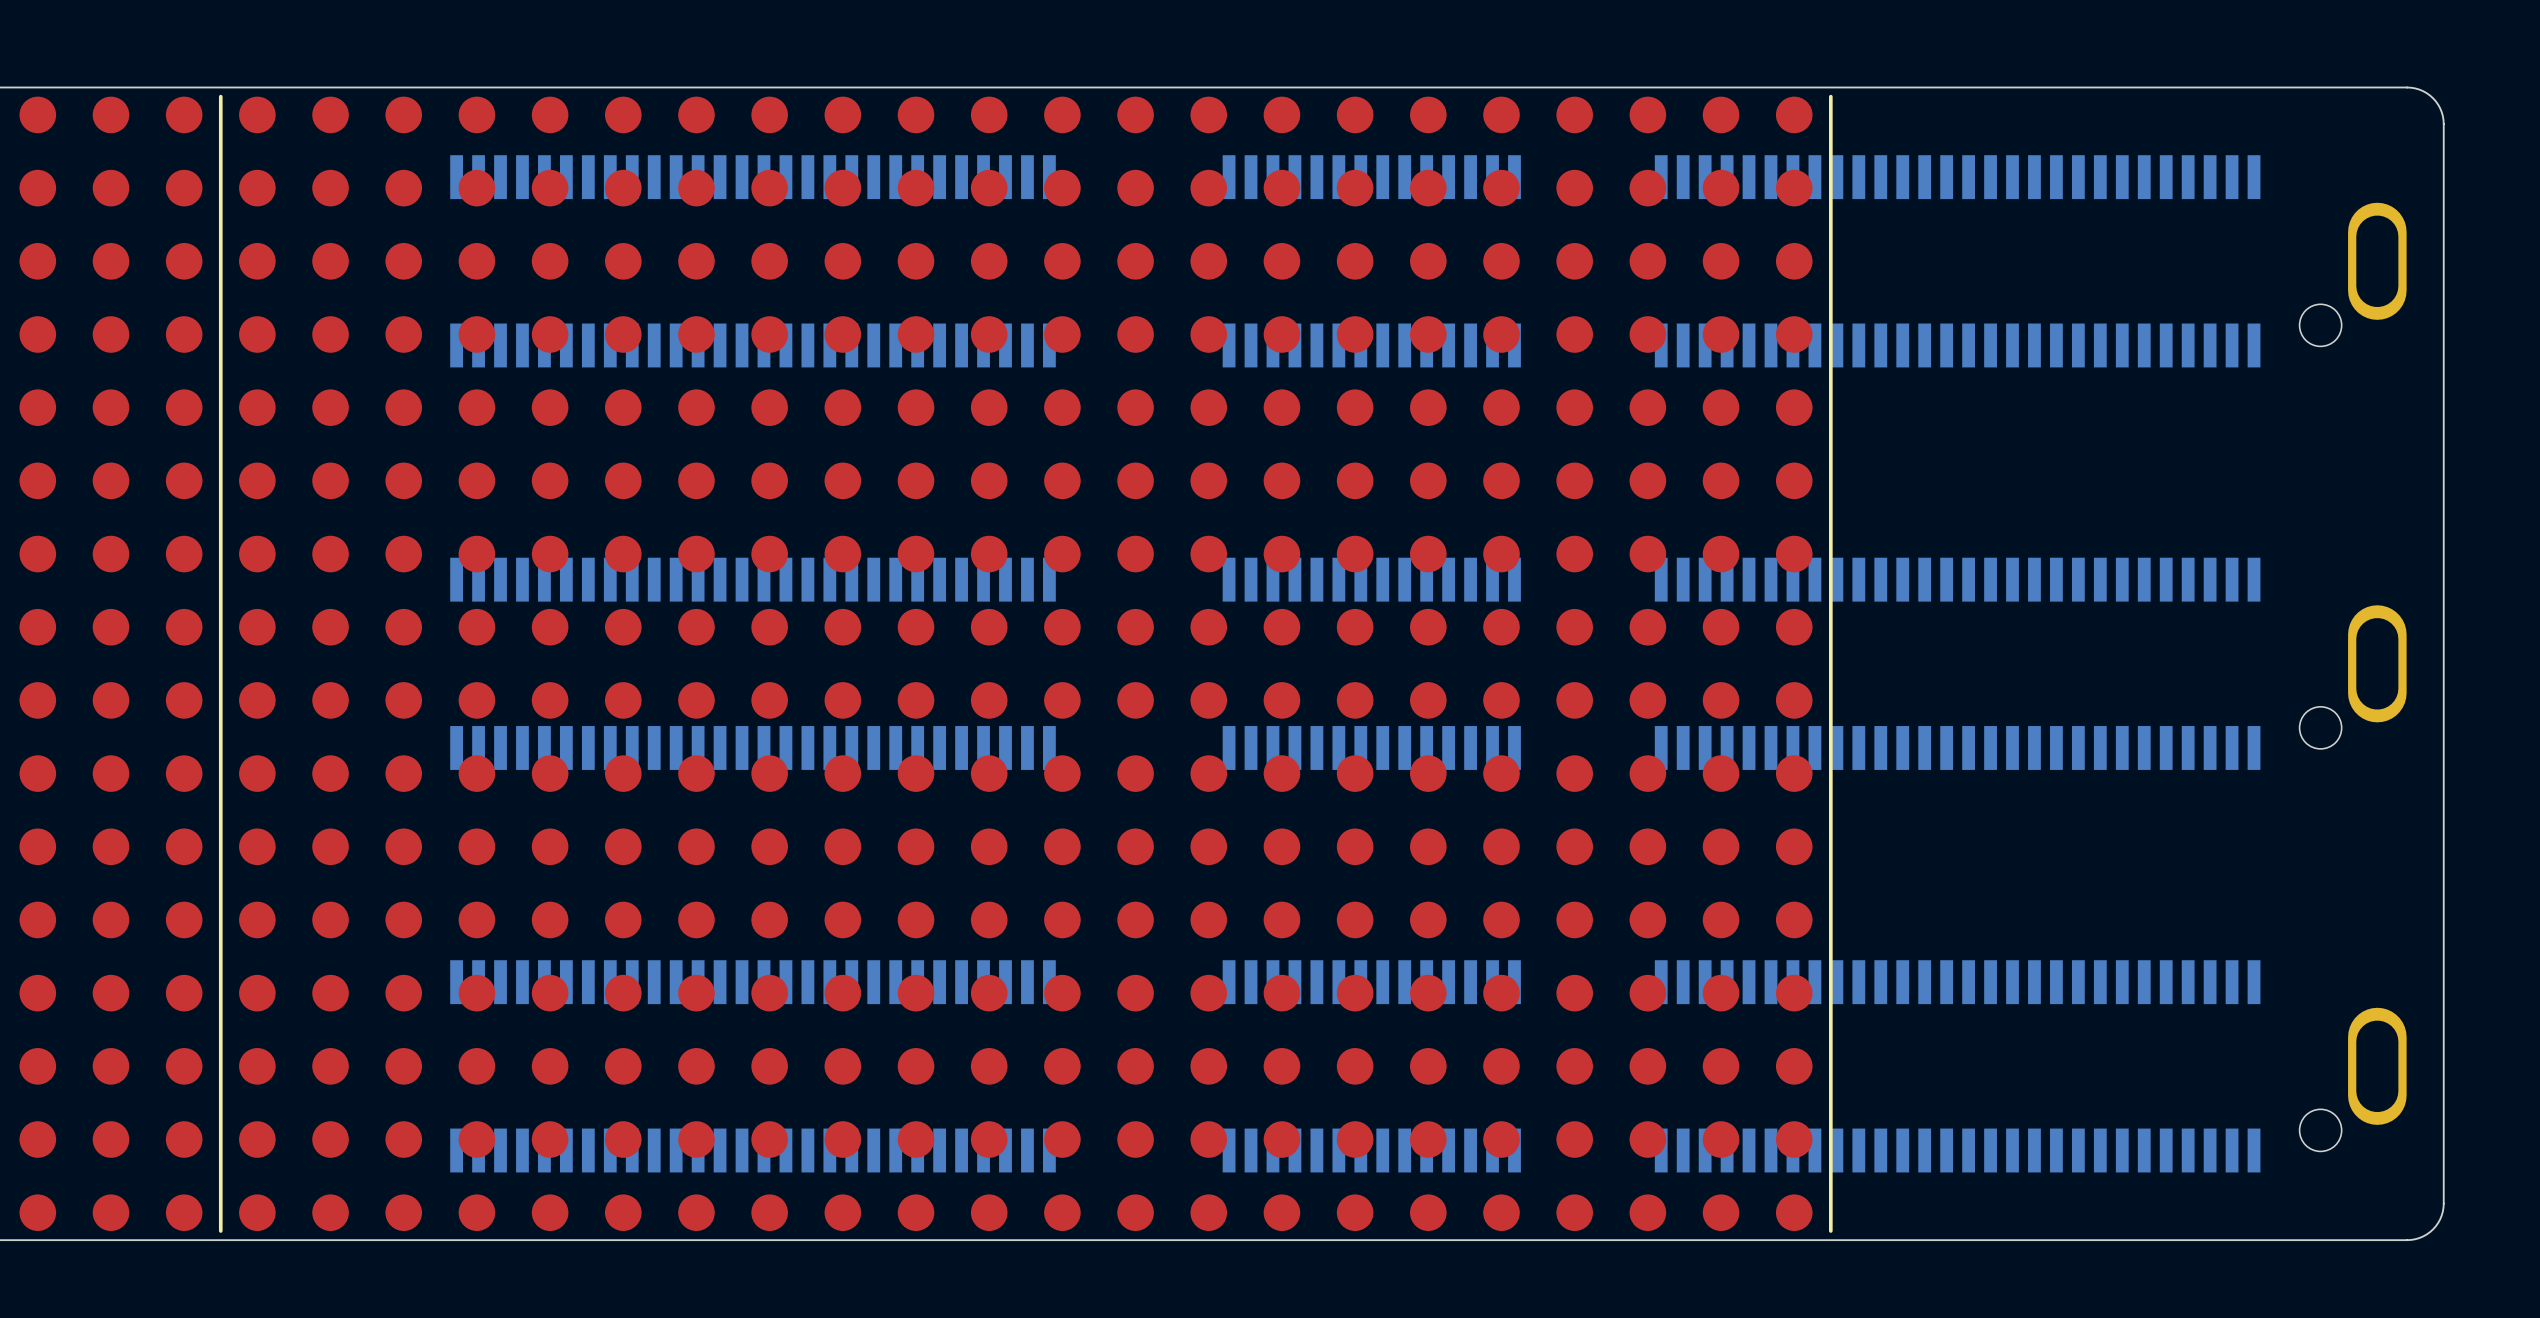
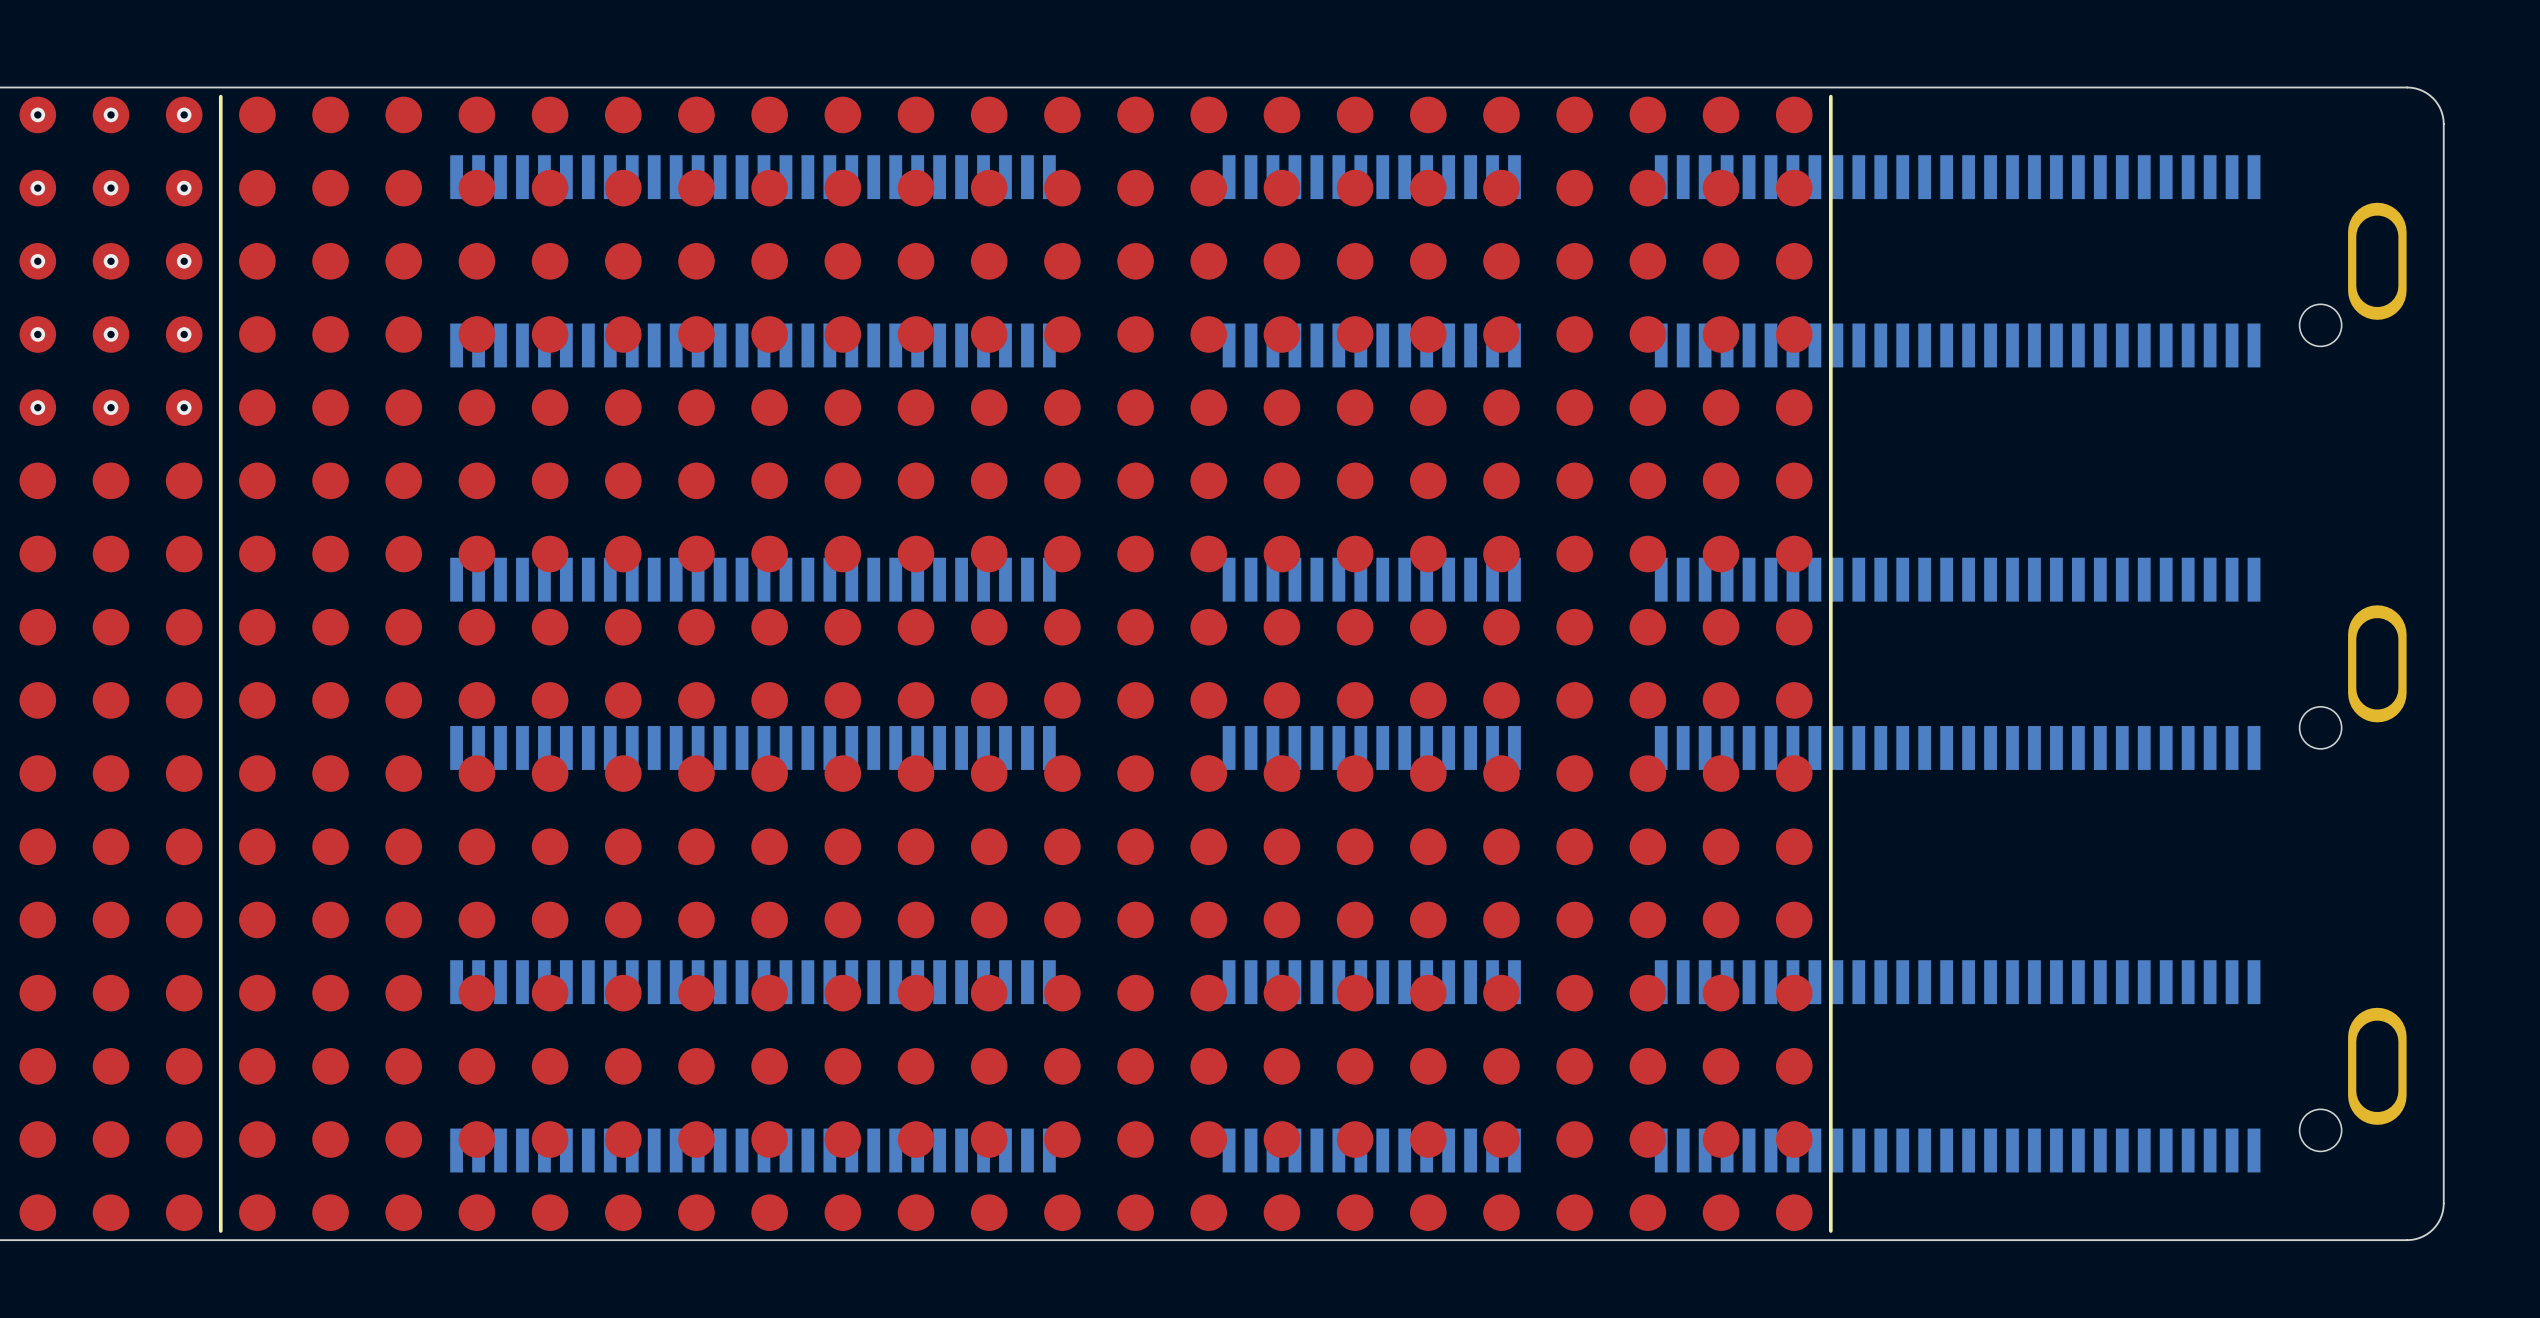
via: none -> (37, 114)
via: none -> (110, 114)
via: none -> (184, 114)
via: none -> (37, 188)
via: none -> (110, 188)
via: none -> (184, 188)
via: none -> (37, 261)
via: none -> (110, 261)
via: none -> (184, 261)
via: none -> (37, 334)
via: none -> (110, 334)
via: none -> (184, 334)
via: none -> (37, 407)
via: none -> (110, 407)
via: none -> (184, 407)

